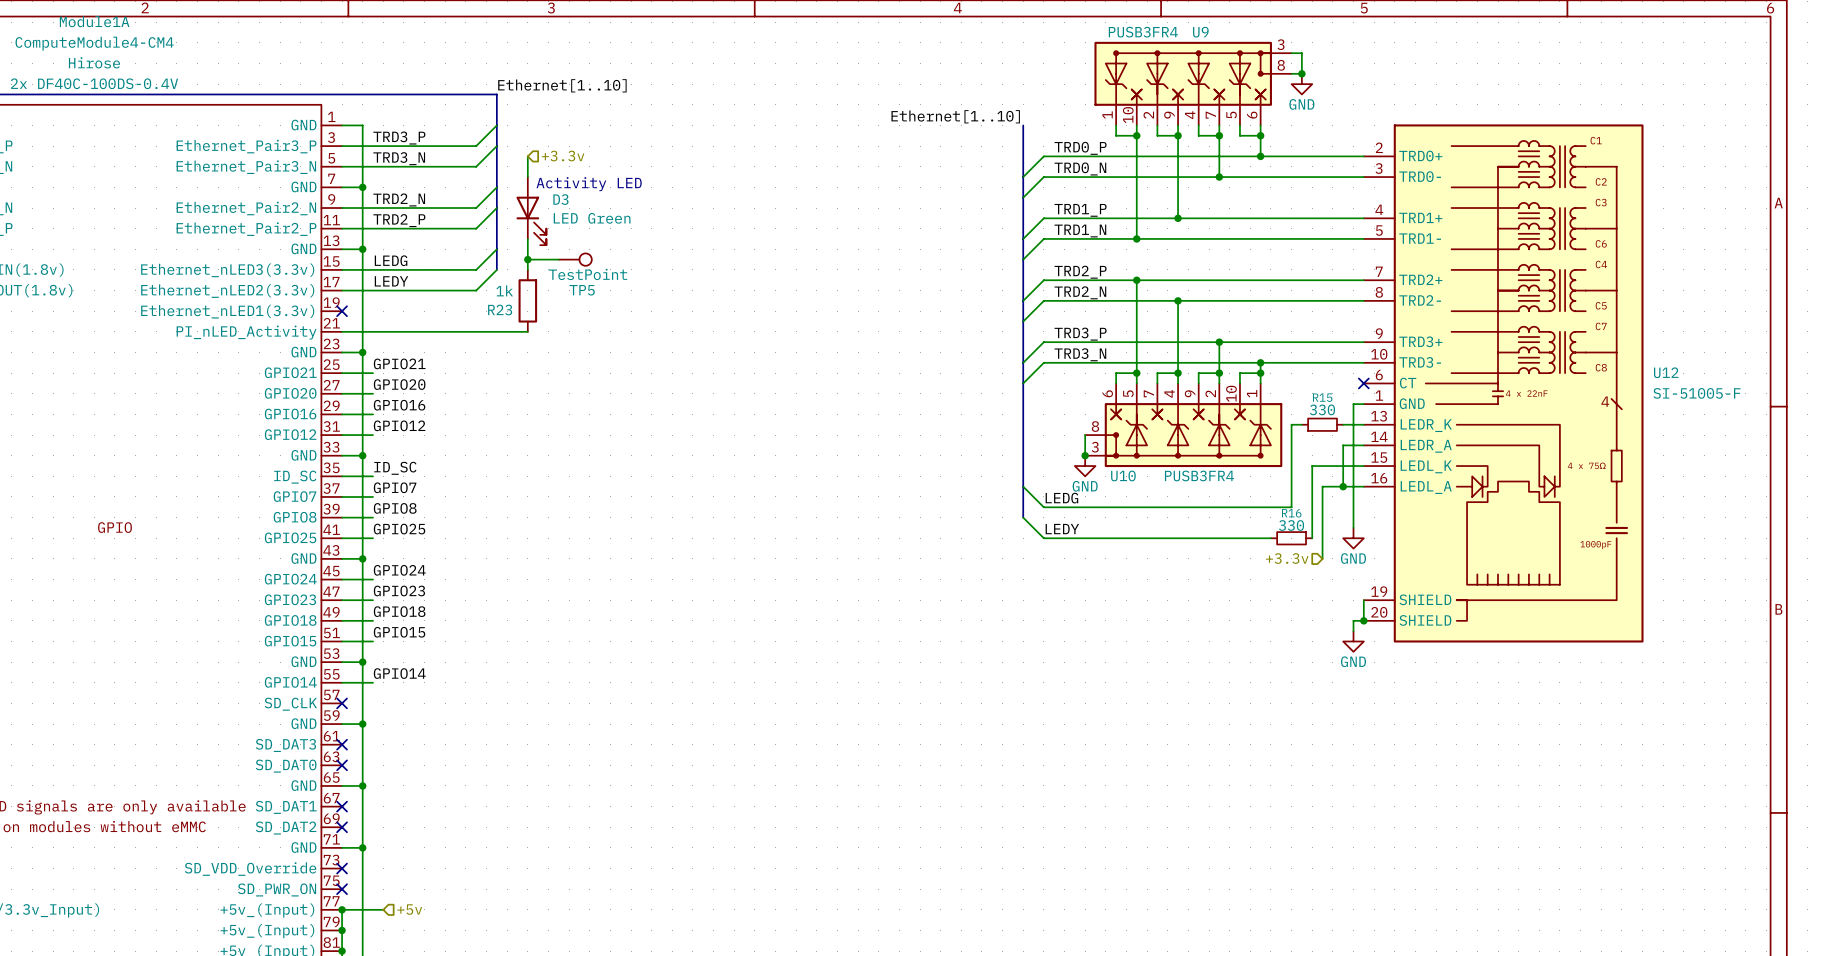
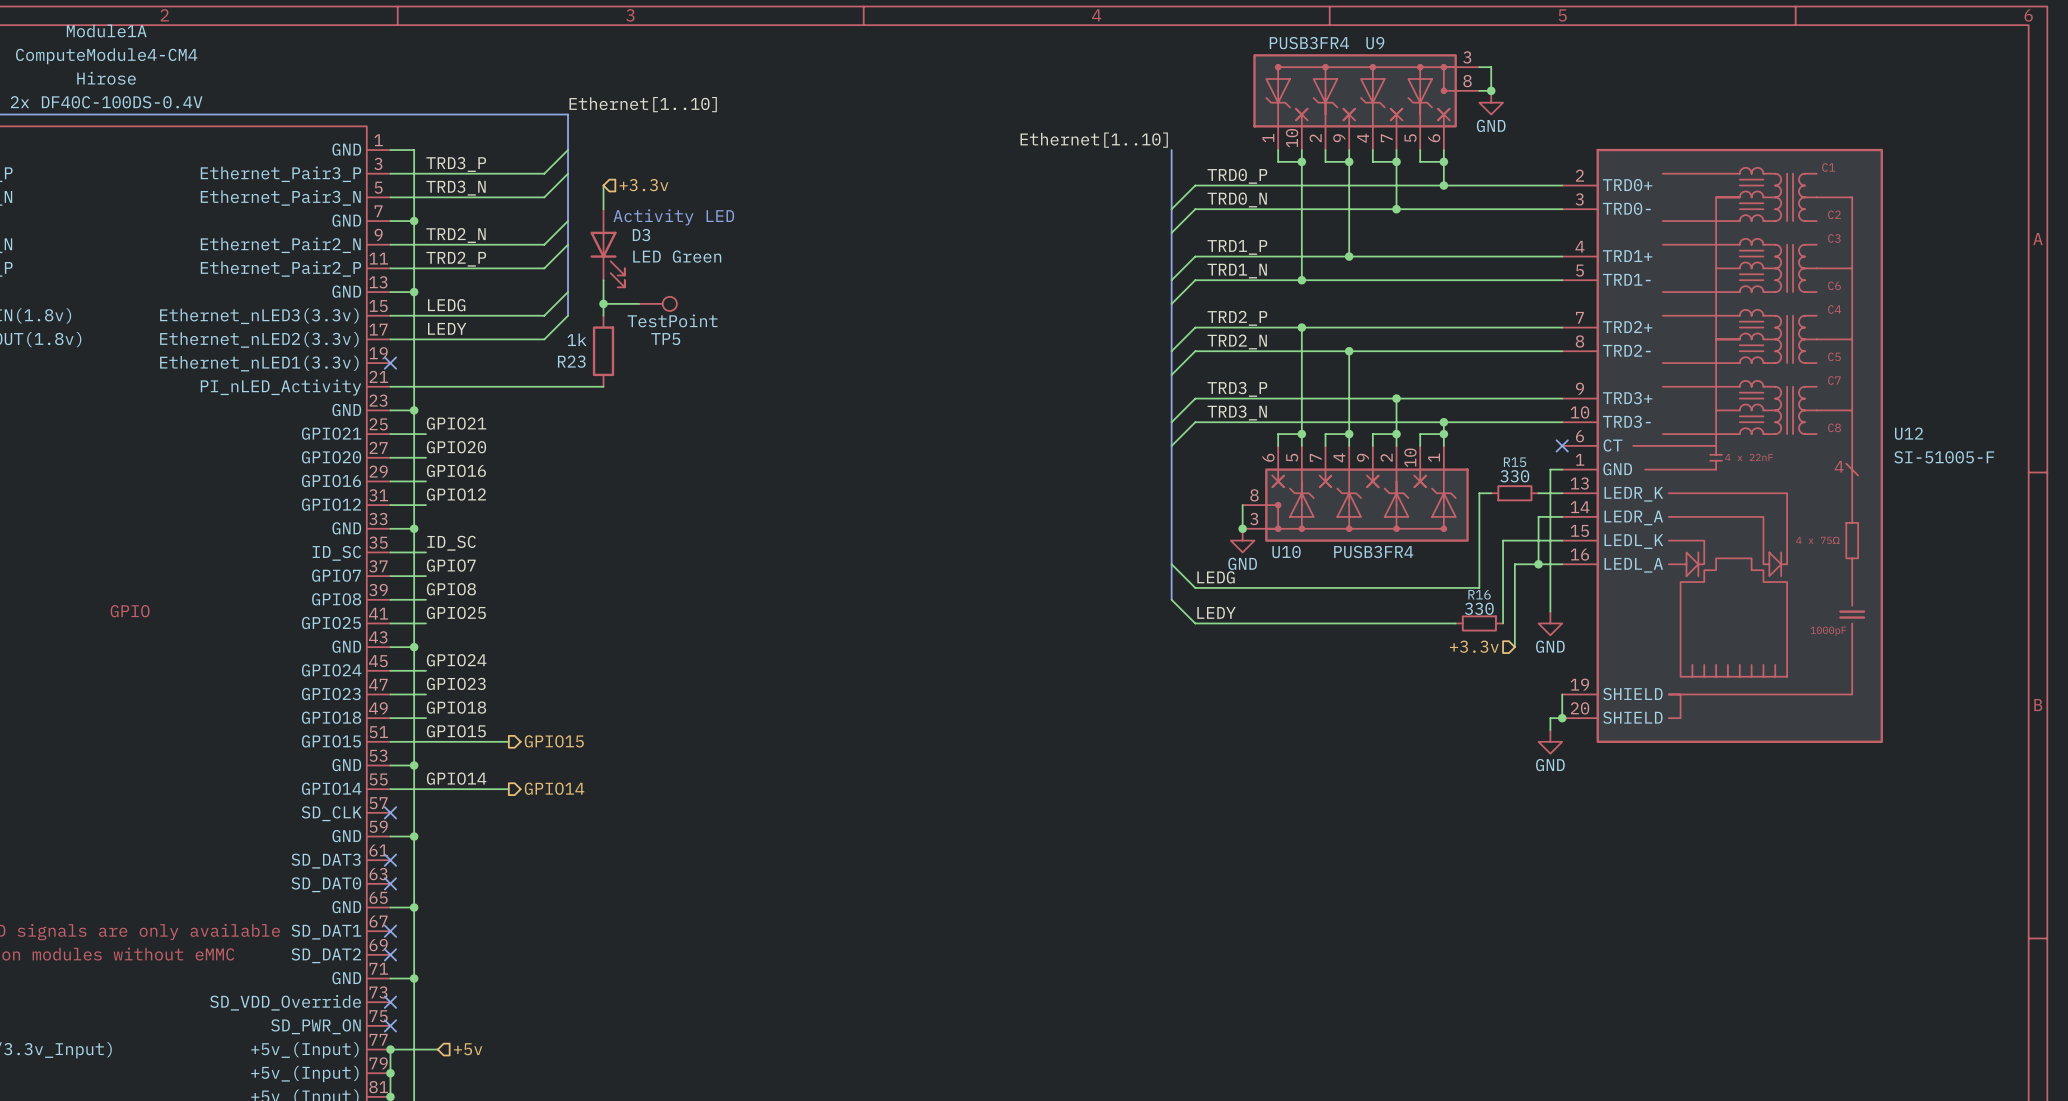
wire: none -> (425, 741) (508, 741)
hierarchical label: none -> GPIO15 (554, 741)
wire: none -> (425, 789) (508, 789)
hierarchical label: none -> GPIO14 (554, 788)

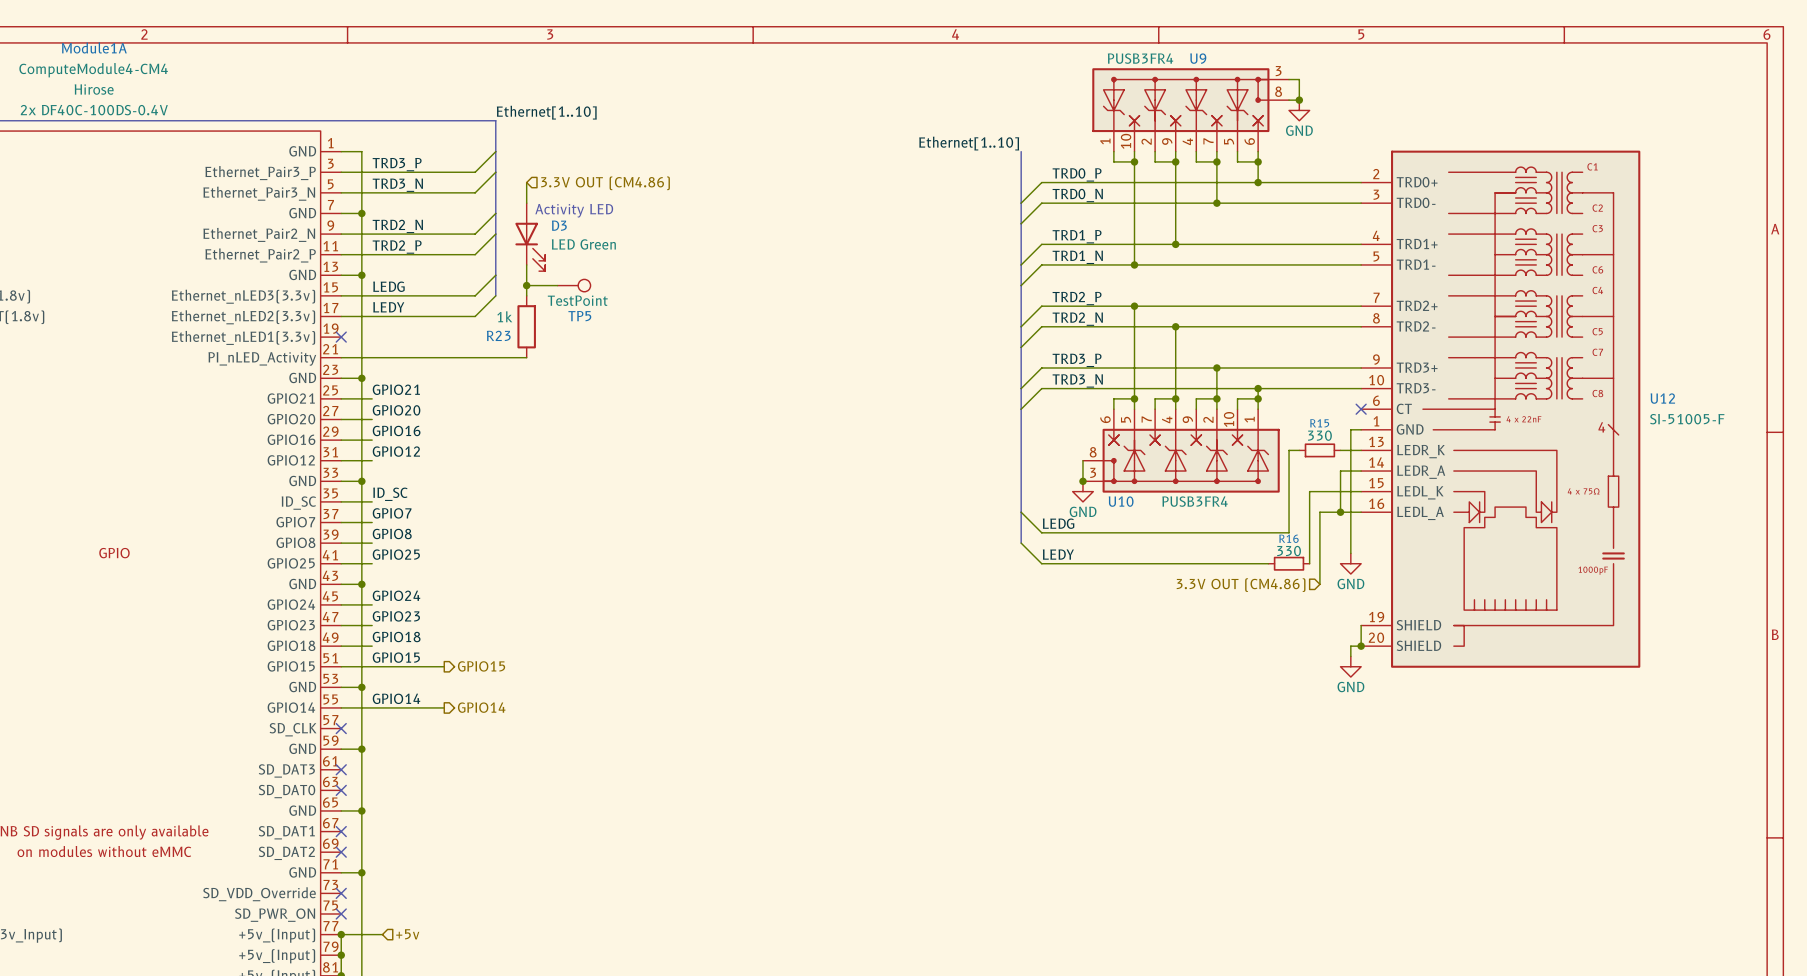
hierarchical label: +3.3v (643, 185) -> 3.3V OUT (CM4.86) (605, 183)
hierarchical label: +3.3v (1474, 646) -> 3.3V OUT (CM4.86) (1241, 585)

